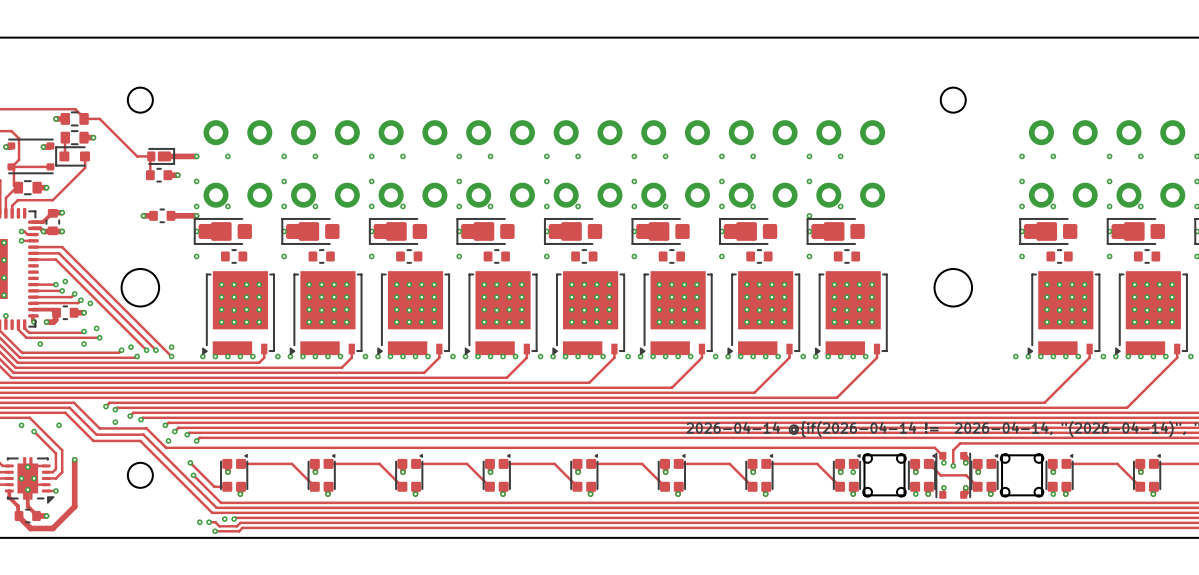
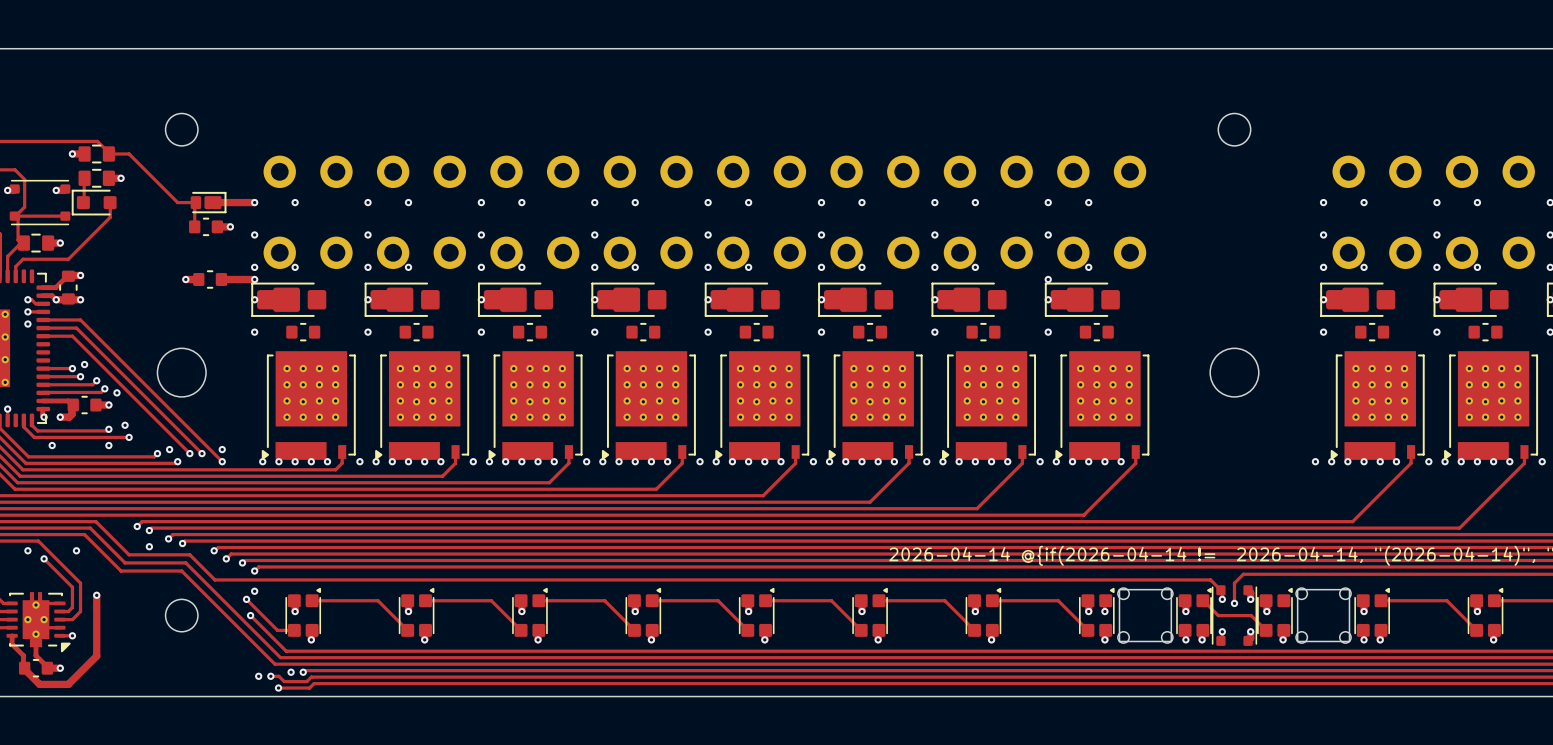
via: none -> (27, 324)
via position: (168, 440) -> (254, 591)

